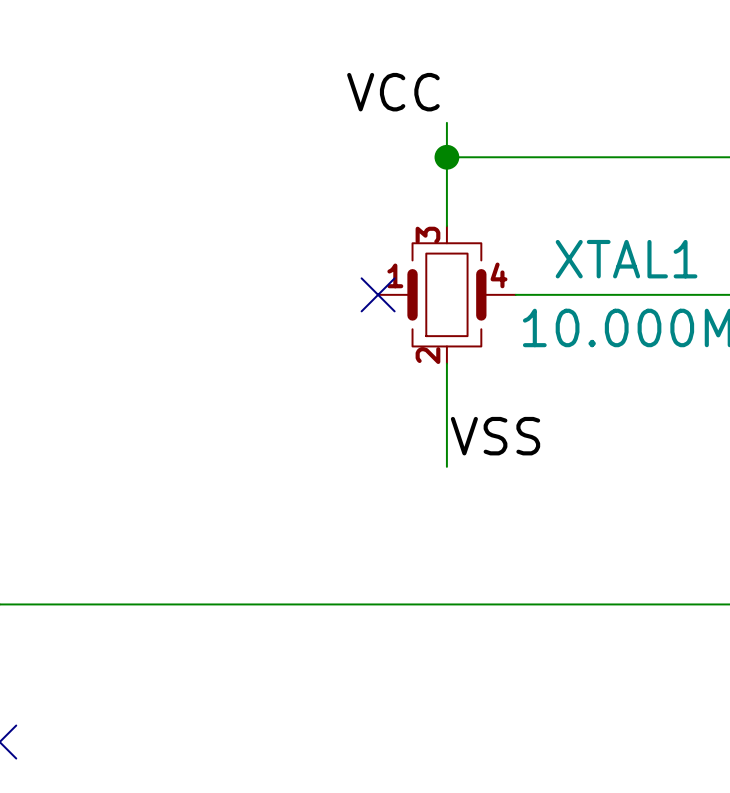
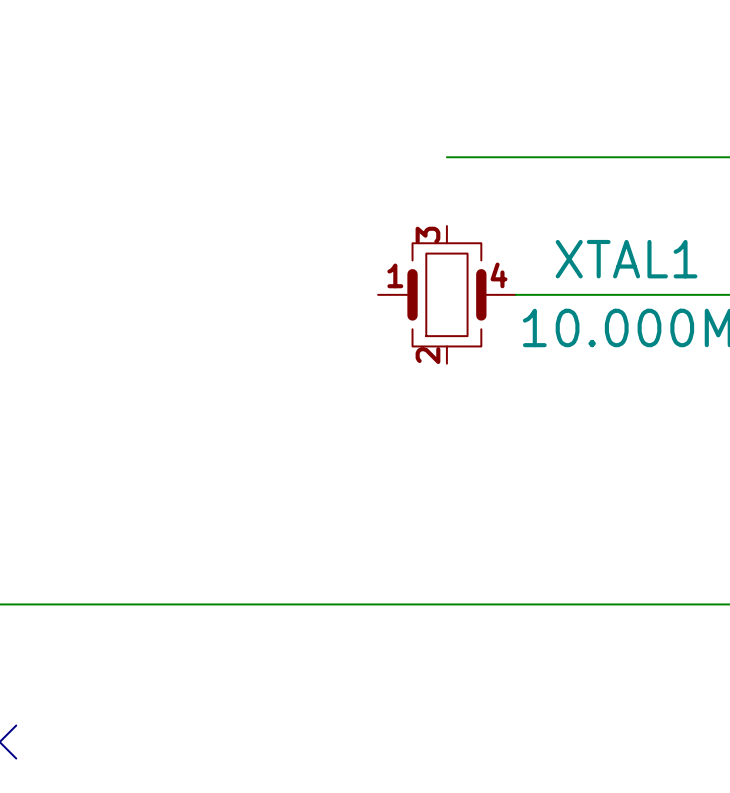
label: VCC (393, 92) -> none
wire: (446, 122) (446, 226) -> none
junction: (446, 157) -> none
no-connect mark: (378, 294) -> none
wire: (446, 363) (446, 466) -> none
label: VSS (495, 436) -> none

